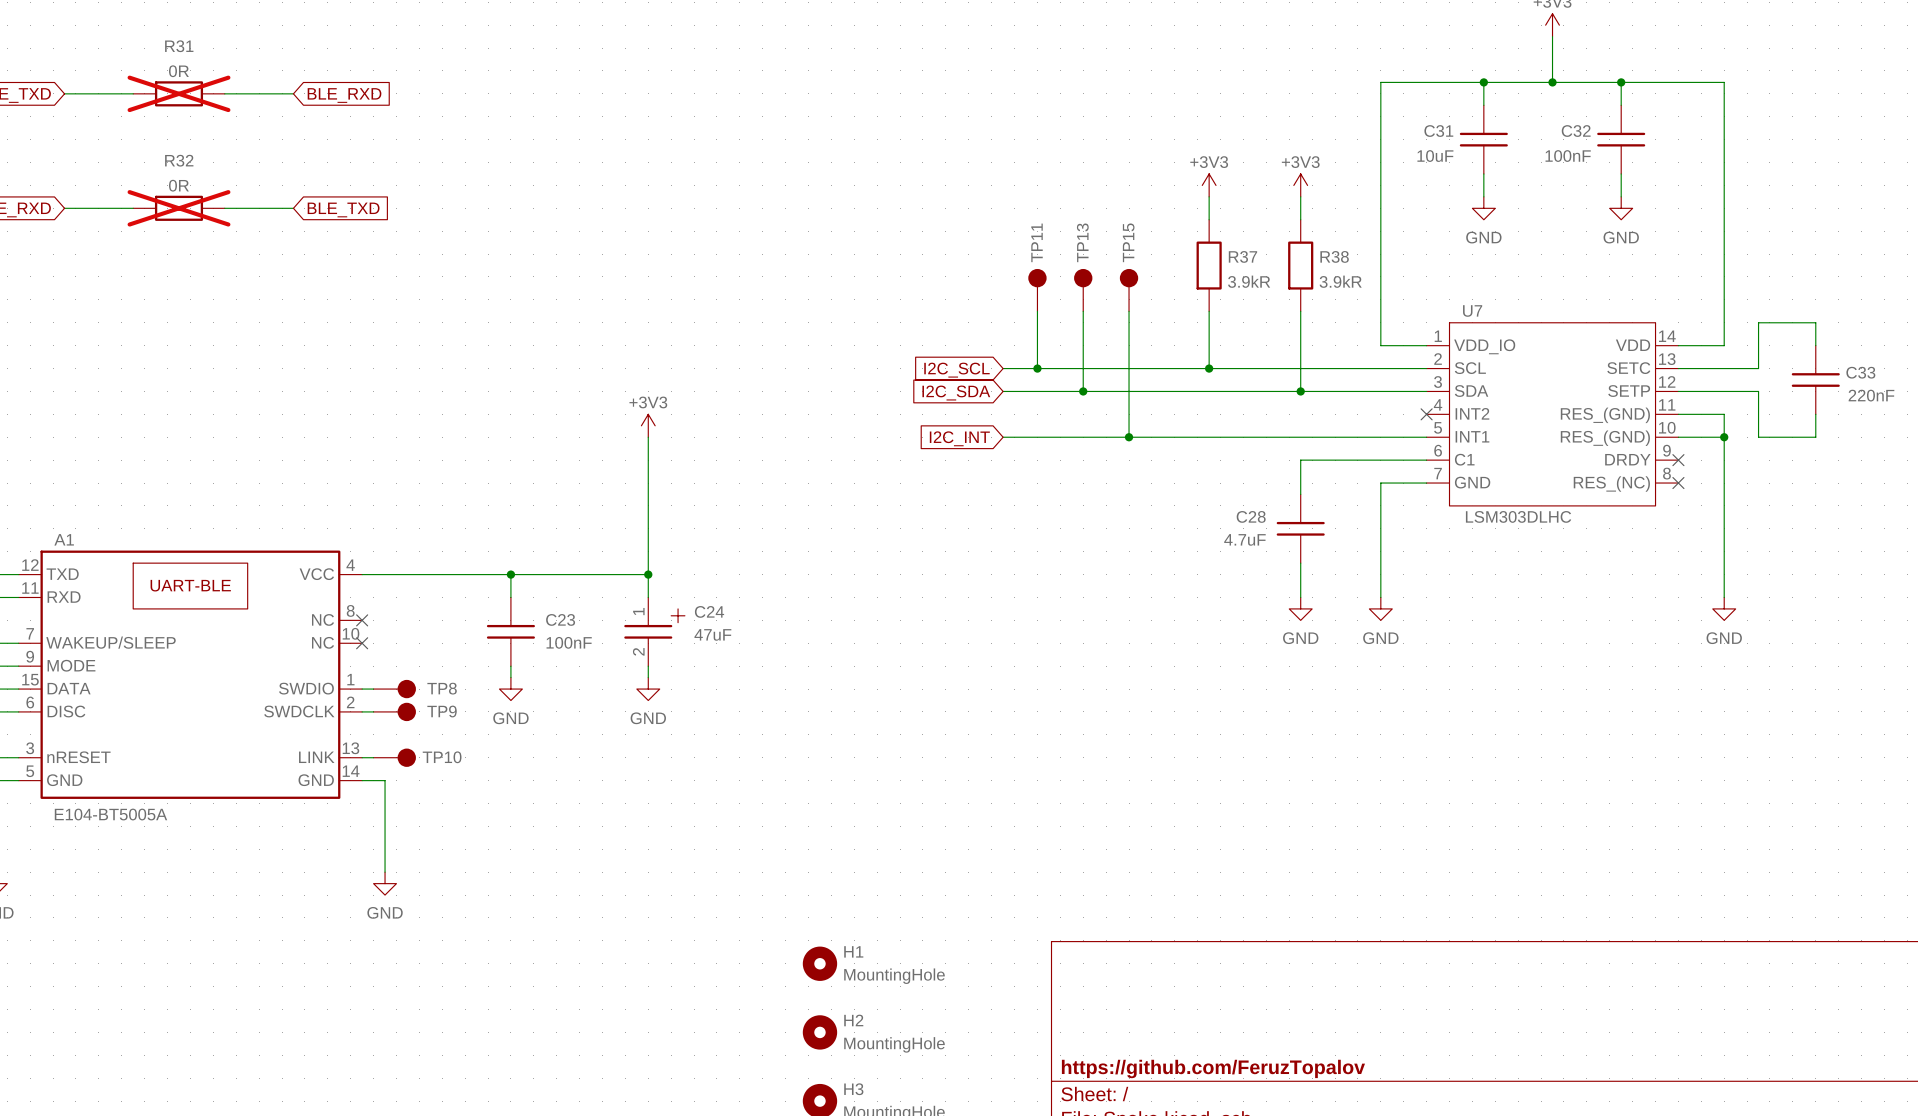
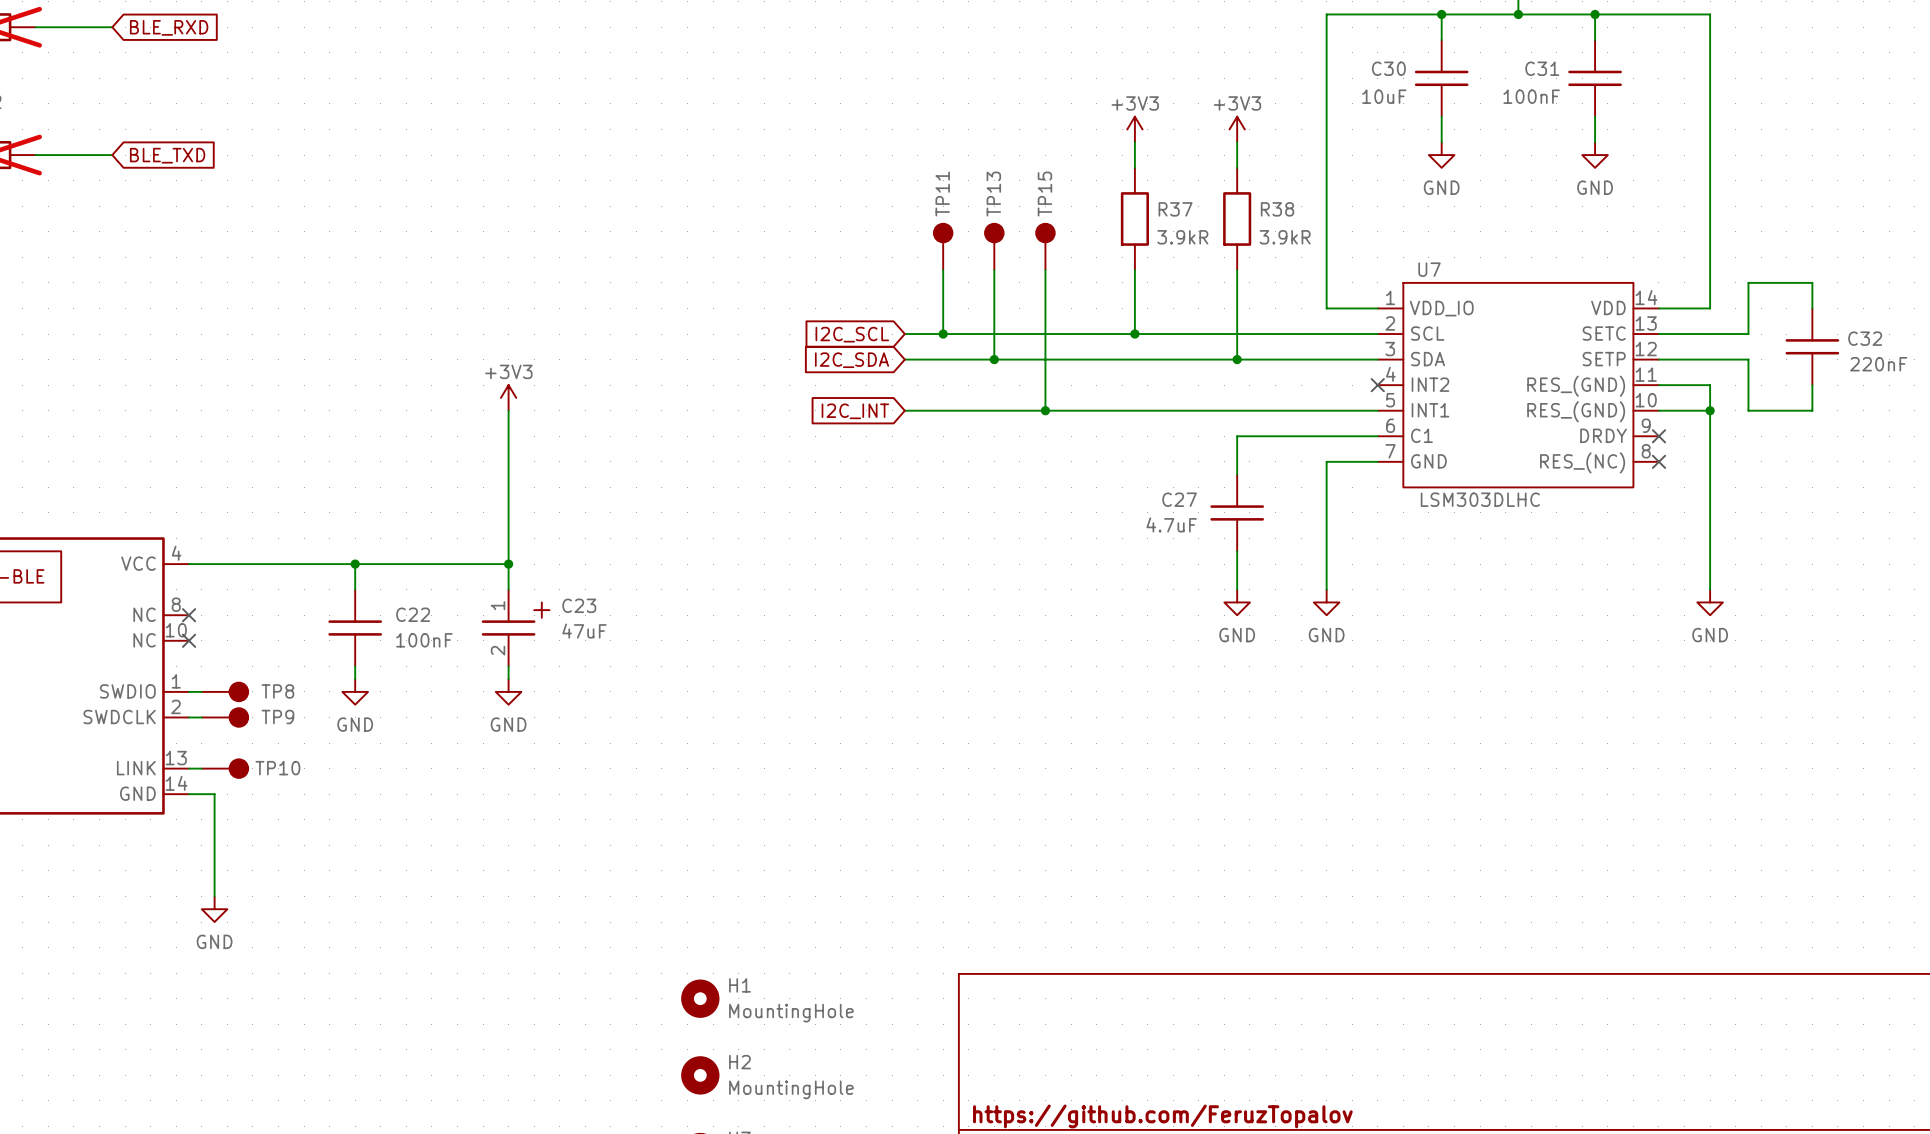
C31 name: C31 (1438, 131) -> C30 (1388, 68)
C32 name: C32 (1576, 131) -> C31 (1542, 68)
C33 name: C33 (1860, 372) -> C32 (1865, 338)
C28 name: C28 (1251, 516) -> C27 (1179, 499)
C24 name: C24 (709, 611) -> C23 (579, 605)
C23 name: C23 (560, 619) -> C22 (413, 614)

